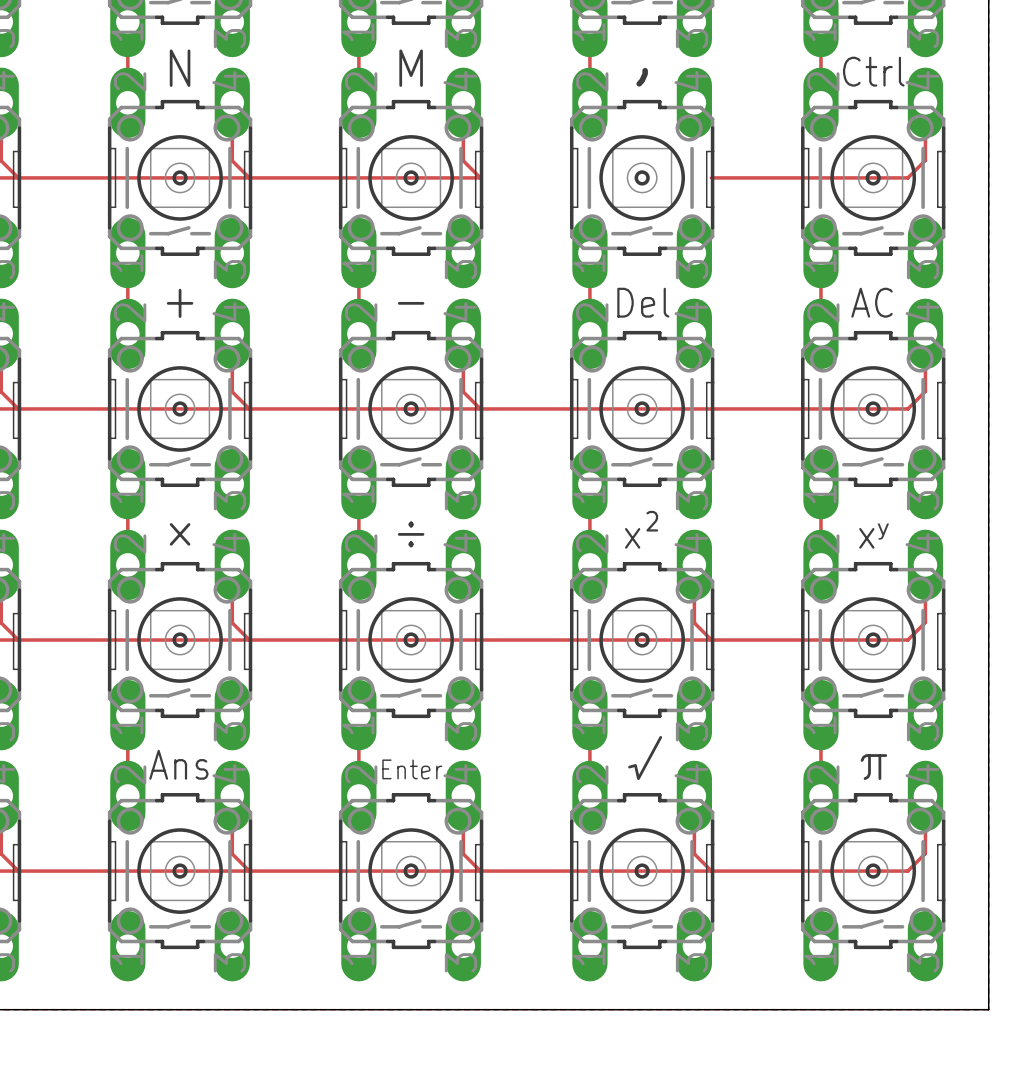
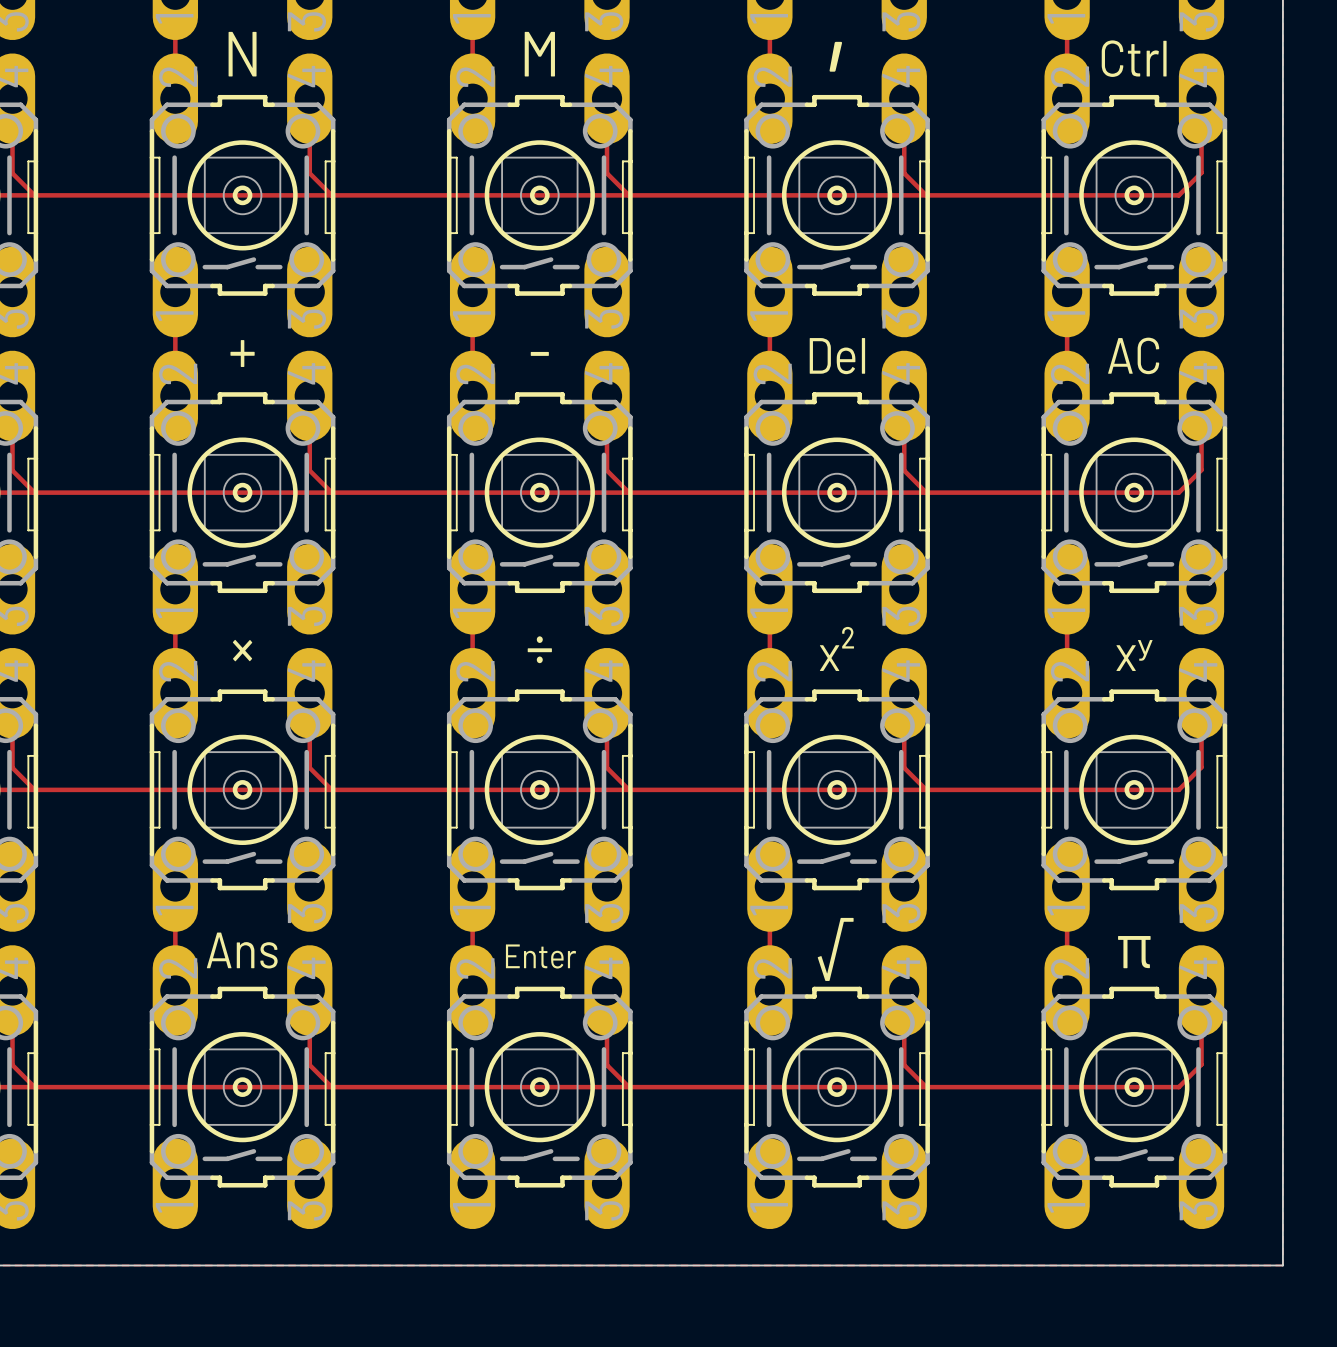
track: none -> (904, 98) (904, 173) (926, 195) (628, 195)
track: none -> (904, 395) (904, 470) (926, 492)
track: none -> (607, 693) (607, 767) (628, 789)

